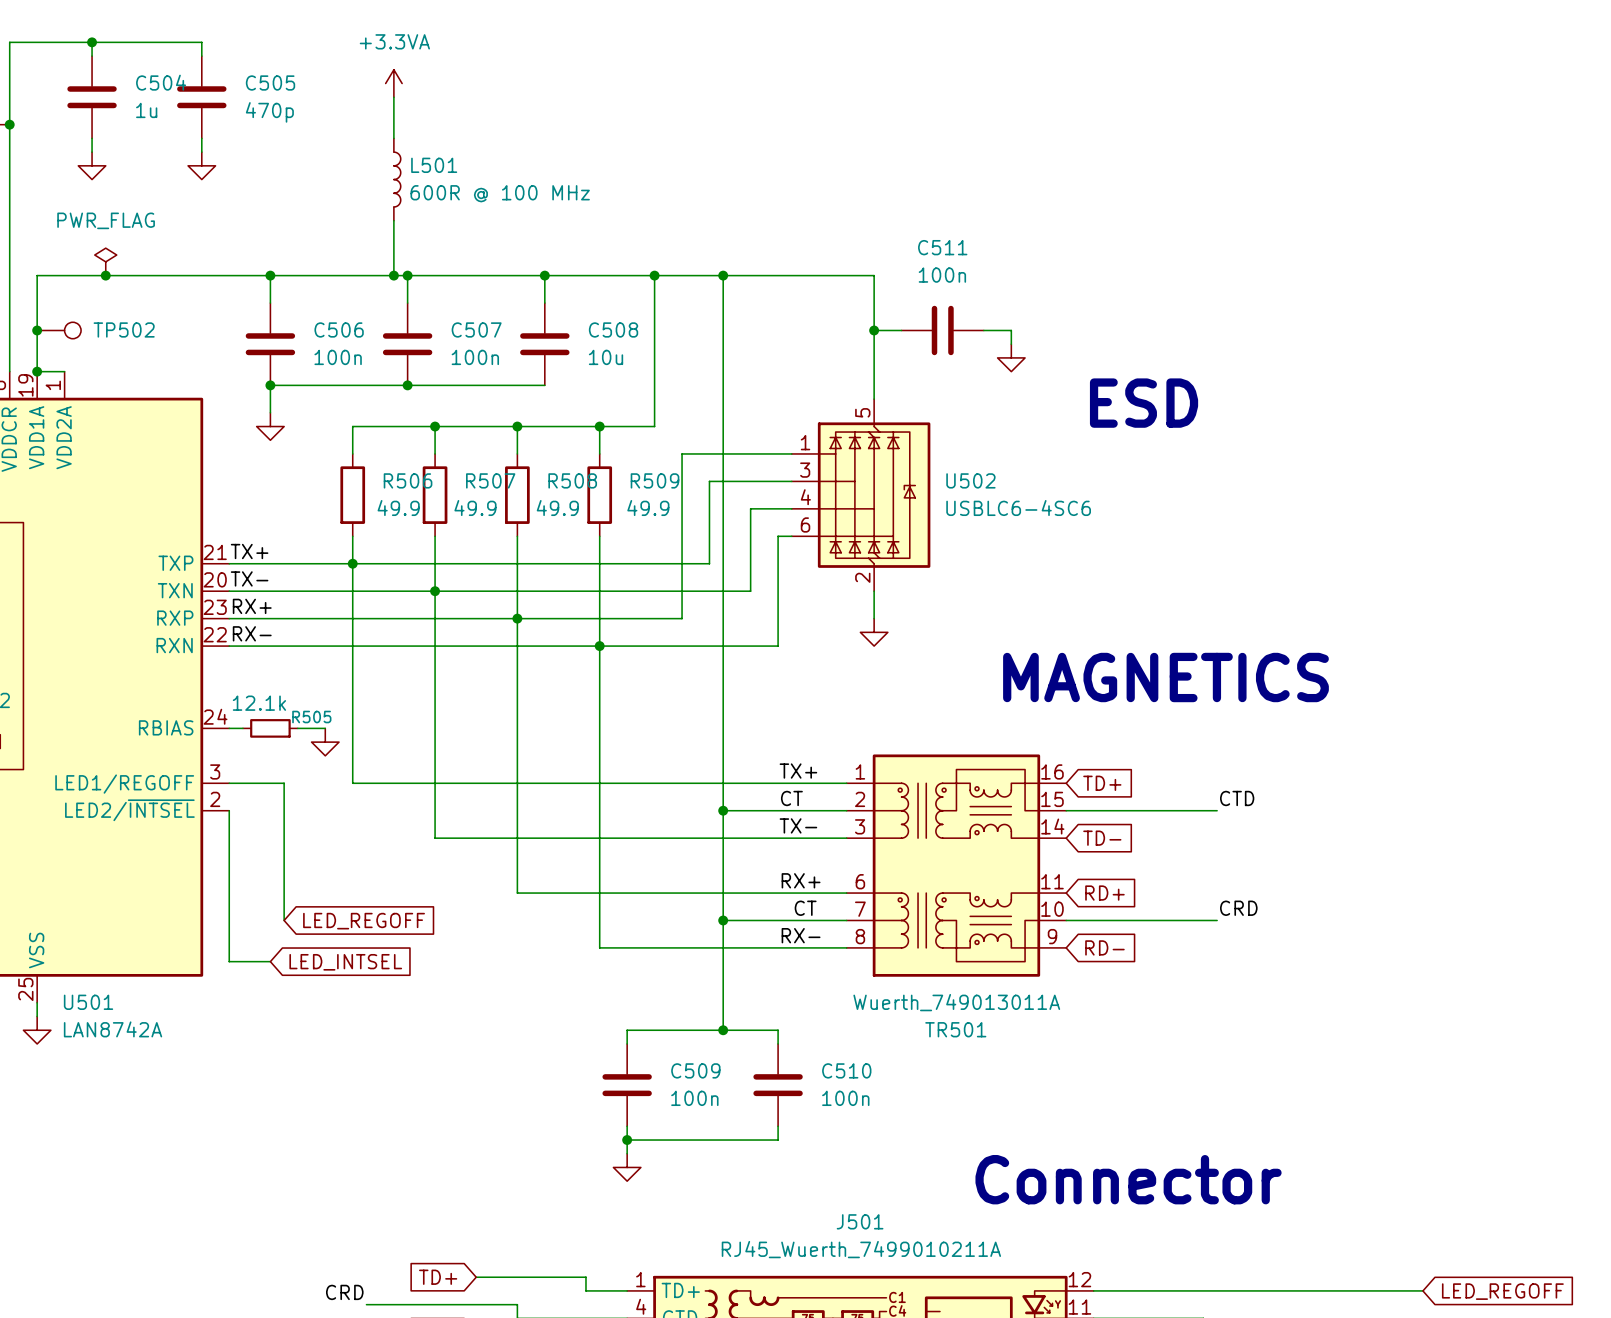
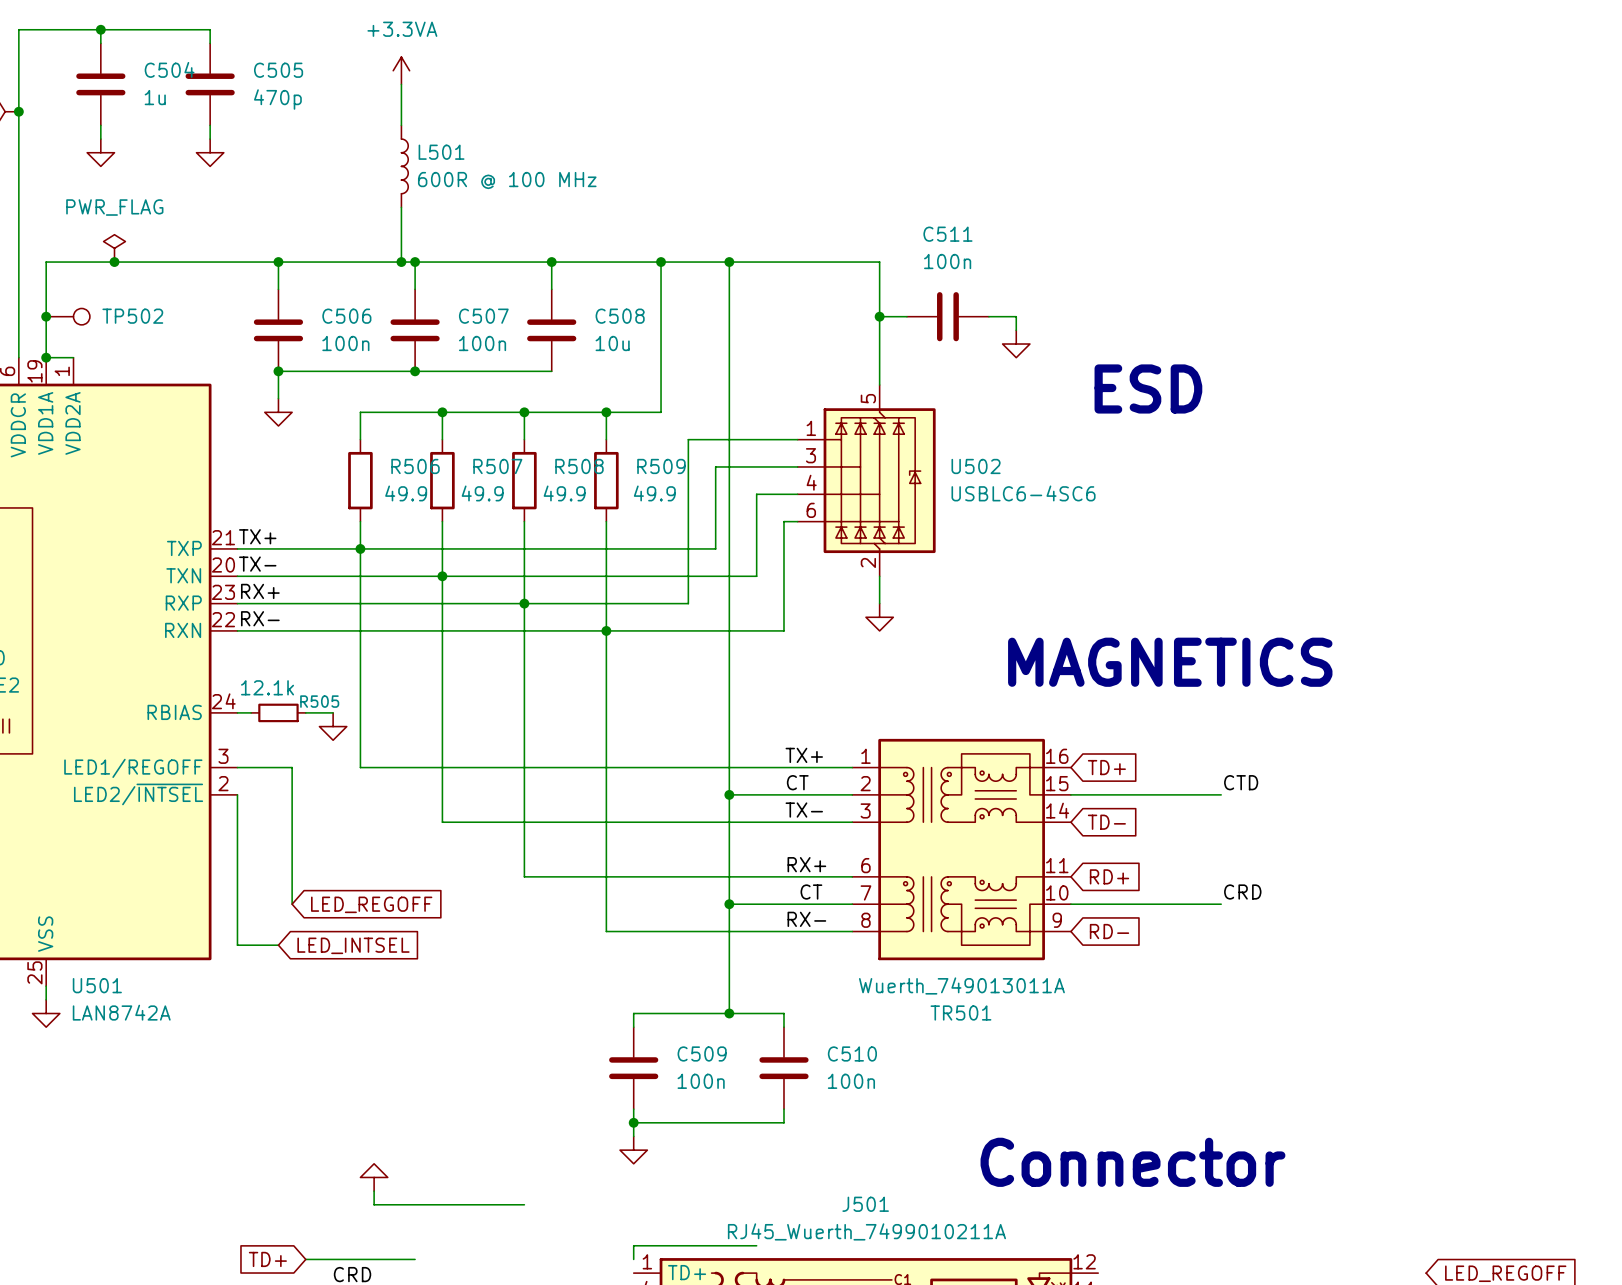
power symbol: none -> (374, 1177)
wire: none -> (374, 1191) (374, 1204) (524, 1204)
wire: none -> (756, 1245) (633, 1245) (633, 1259)
wire: none -> (305, 1259) (415, 1259)
global label position: TD+ (438, 1277) -> TD+ (267, 1259)
wire: (476, 1277) (585, 1277) (585, 1290) (627, 1290) -> none
wire: (1093, 1290) (1422, 1290) -> none

